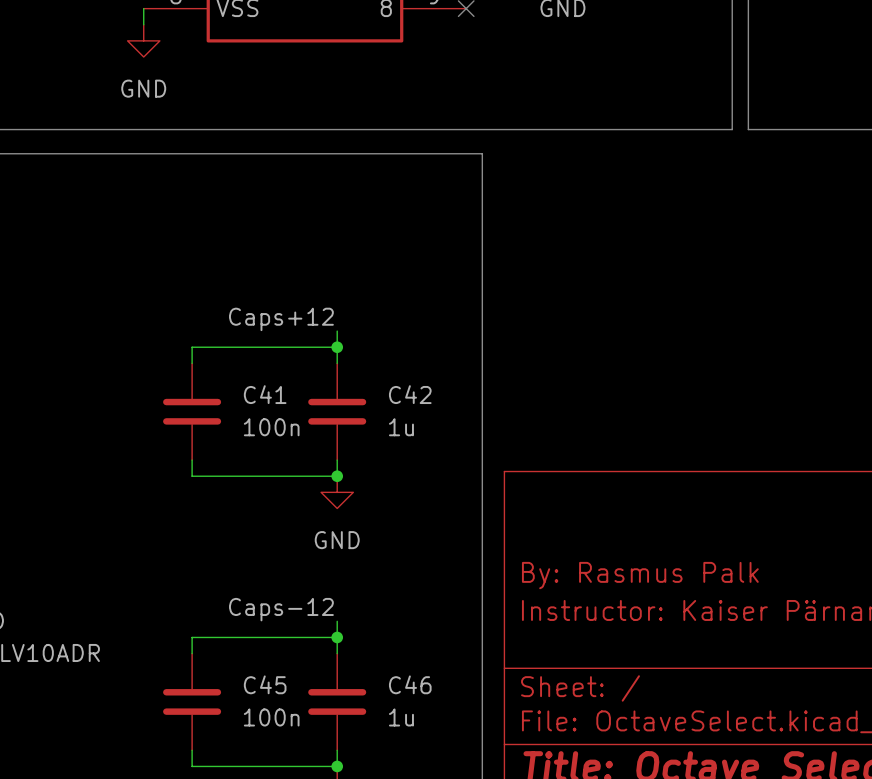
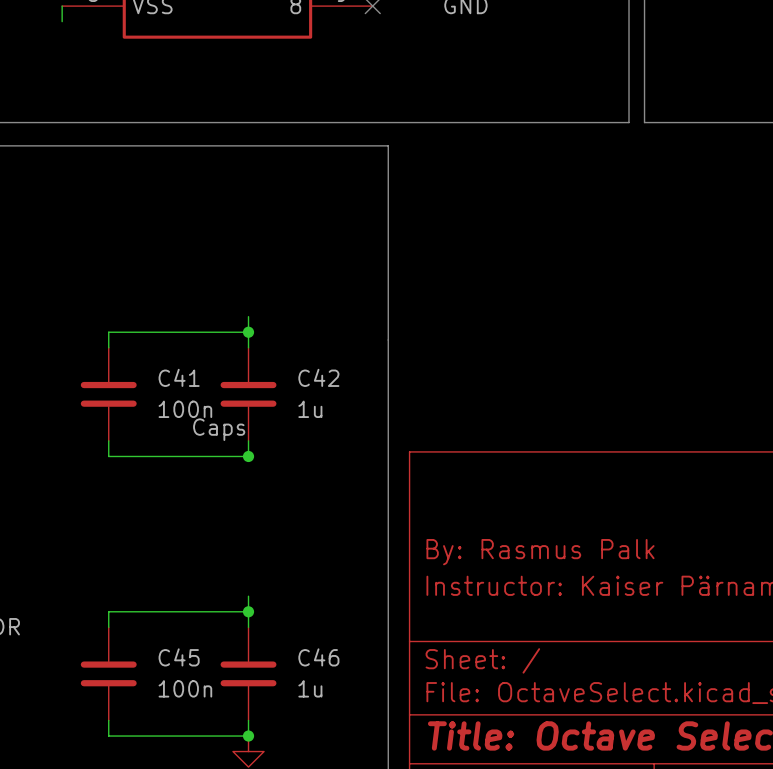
power symbol: GND (143, 40) -> none
label: Caps+12 (281, 319) -> none
label: none -> Caps (219, 429)
power symbol: GND (337, 492) -> none
label: Caps-12 (281, 609) -> none

